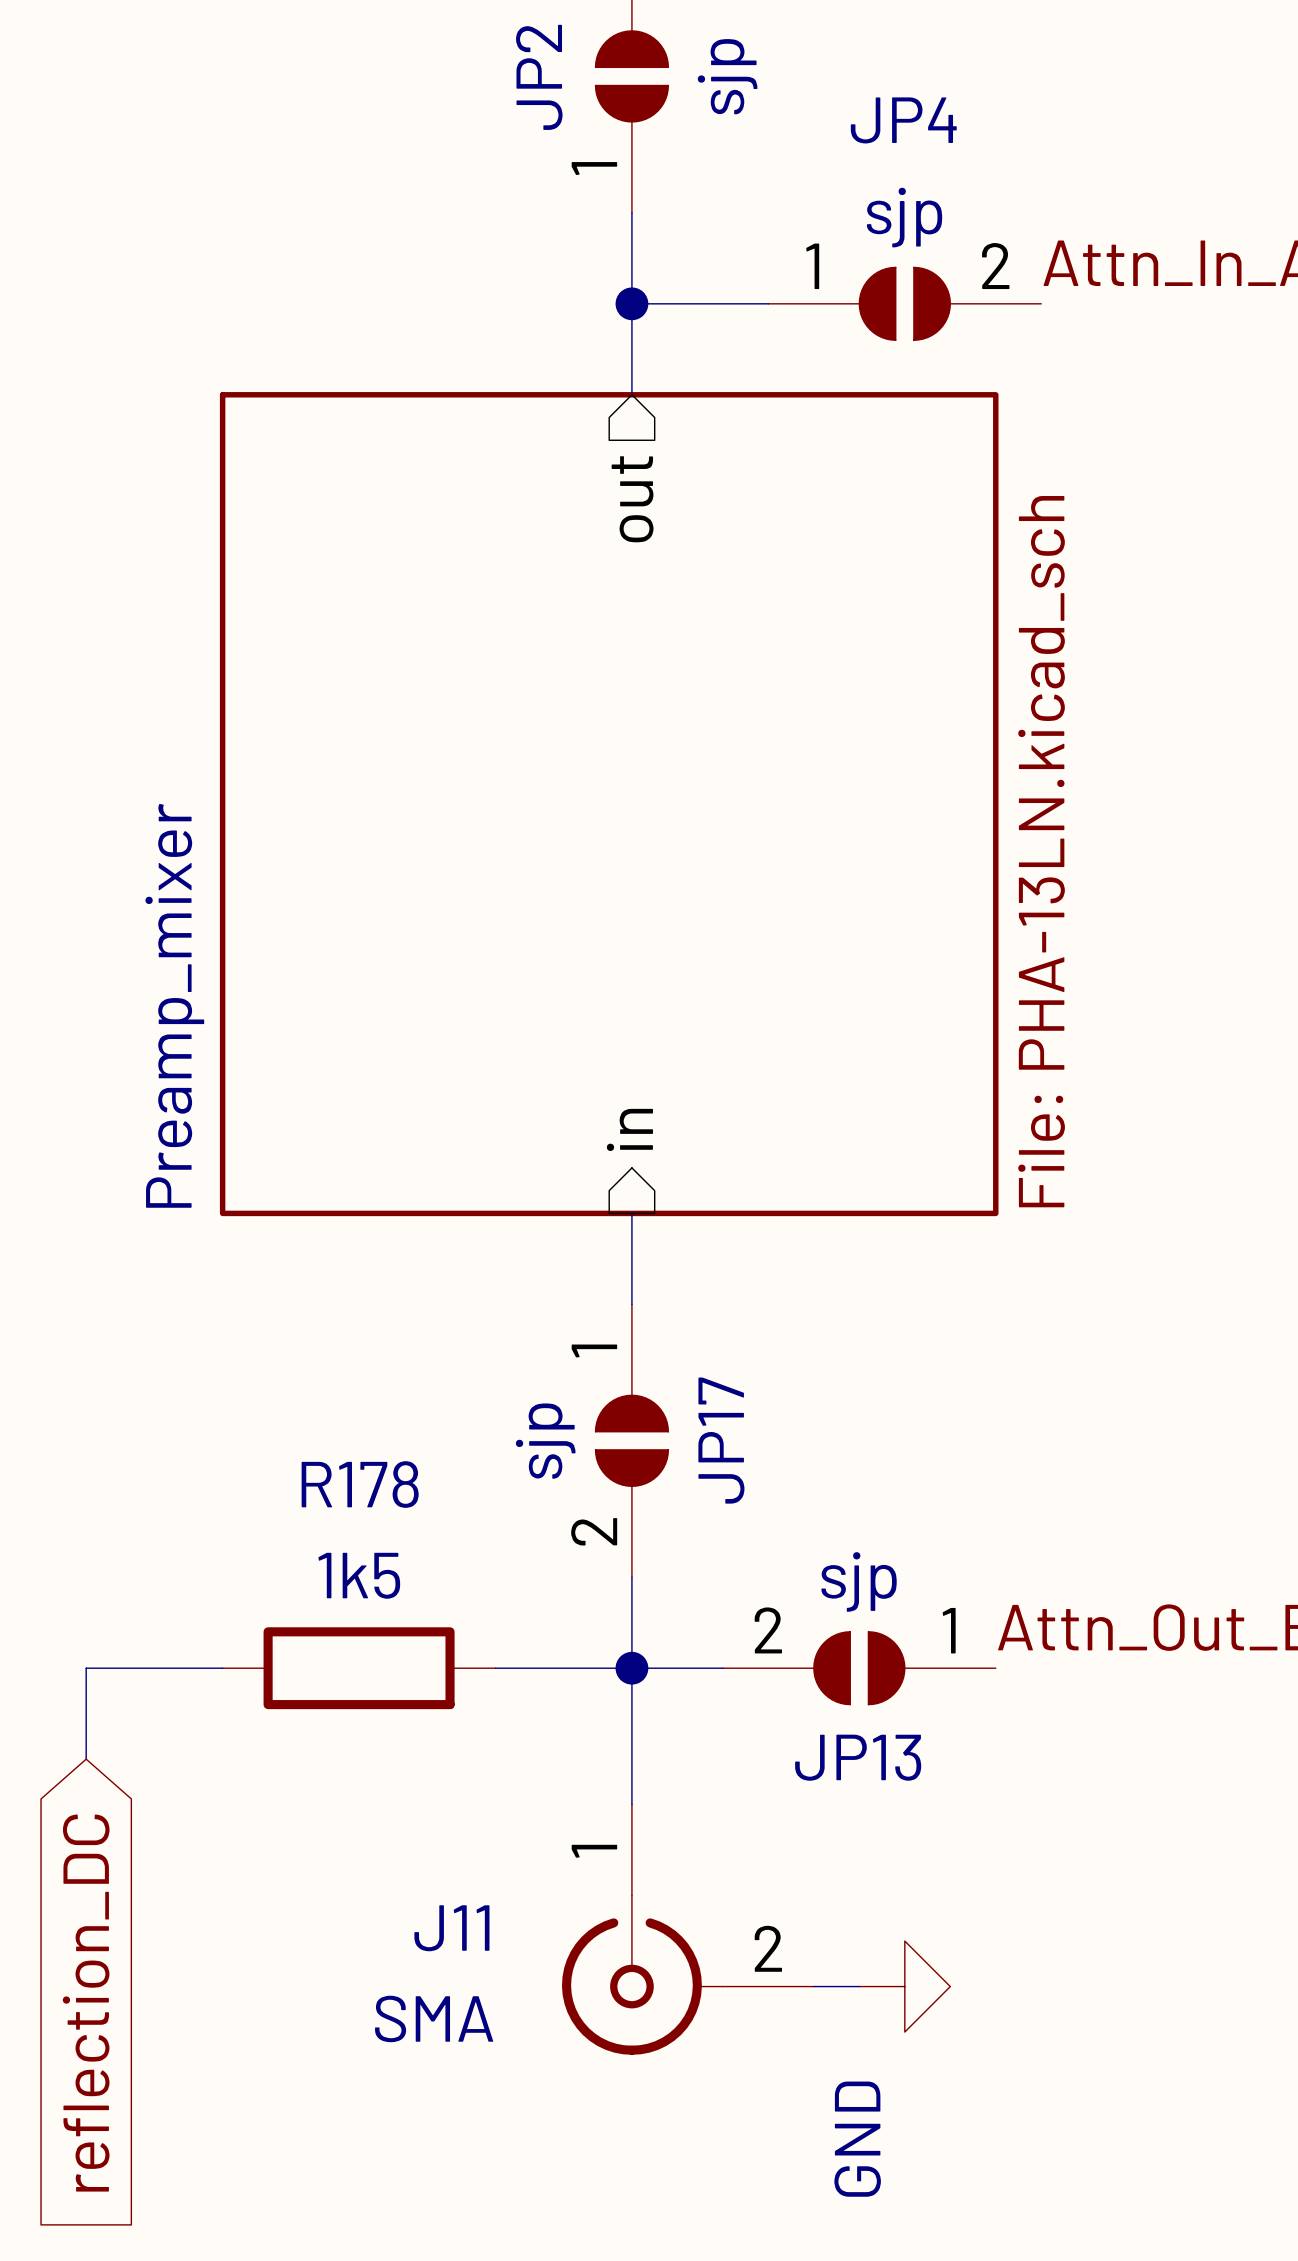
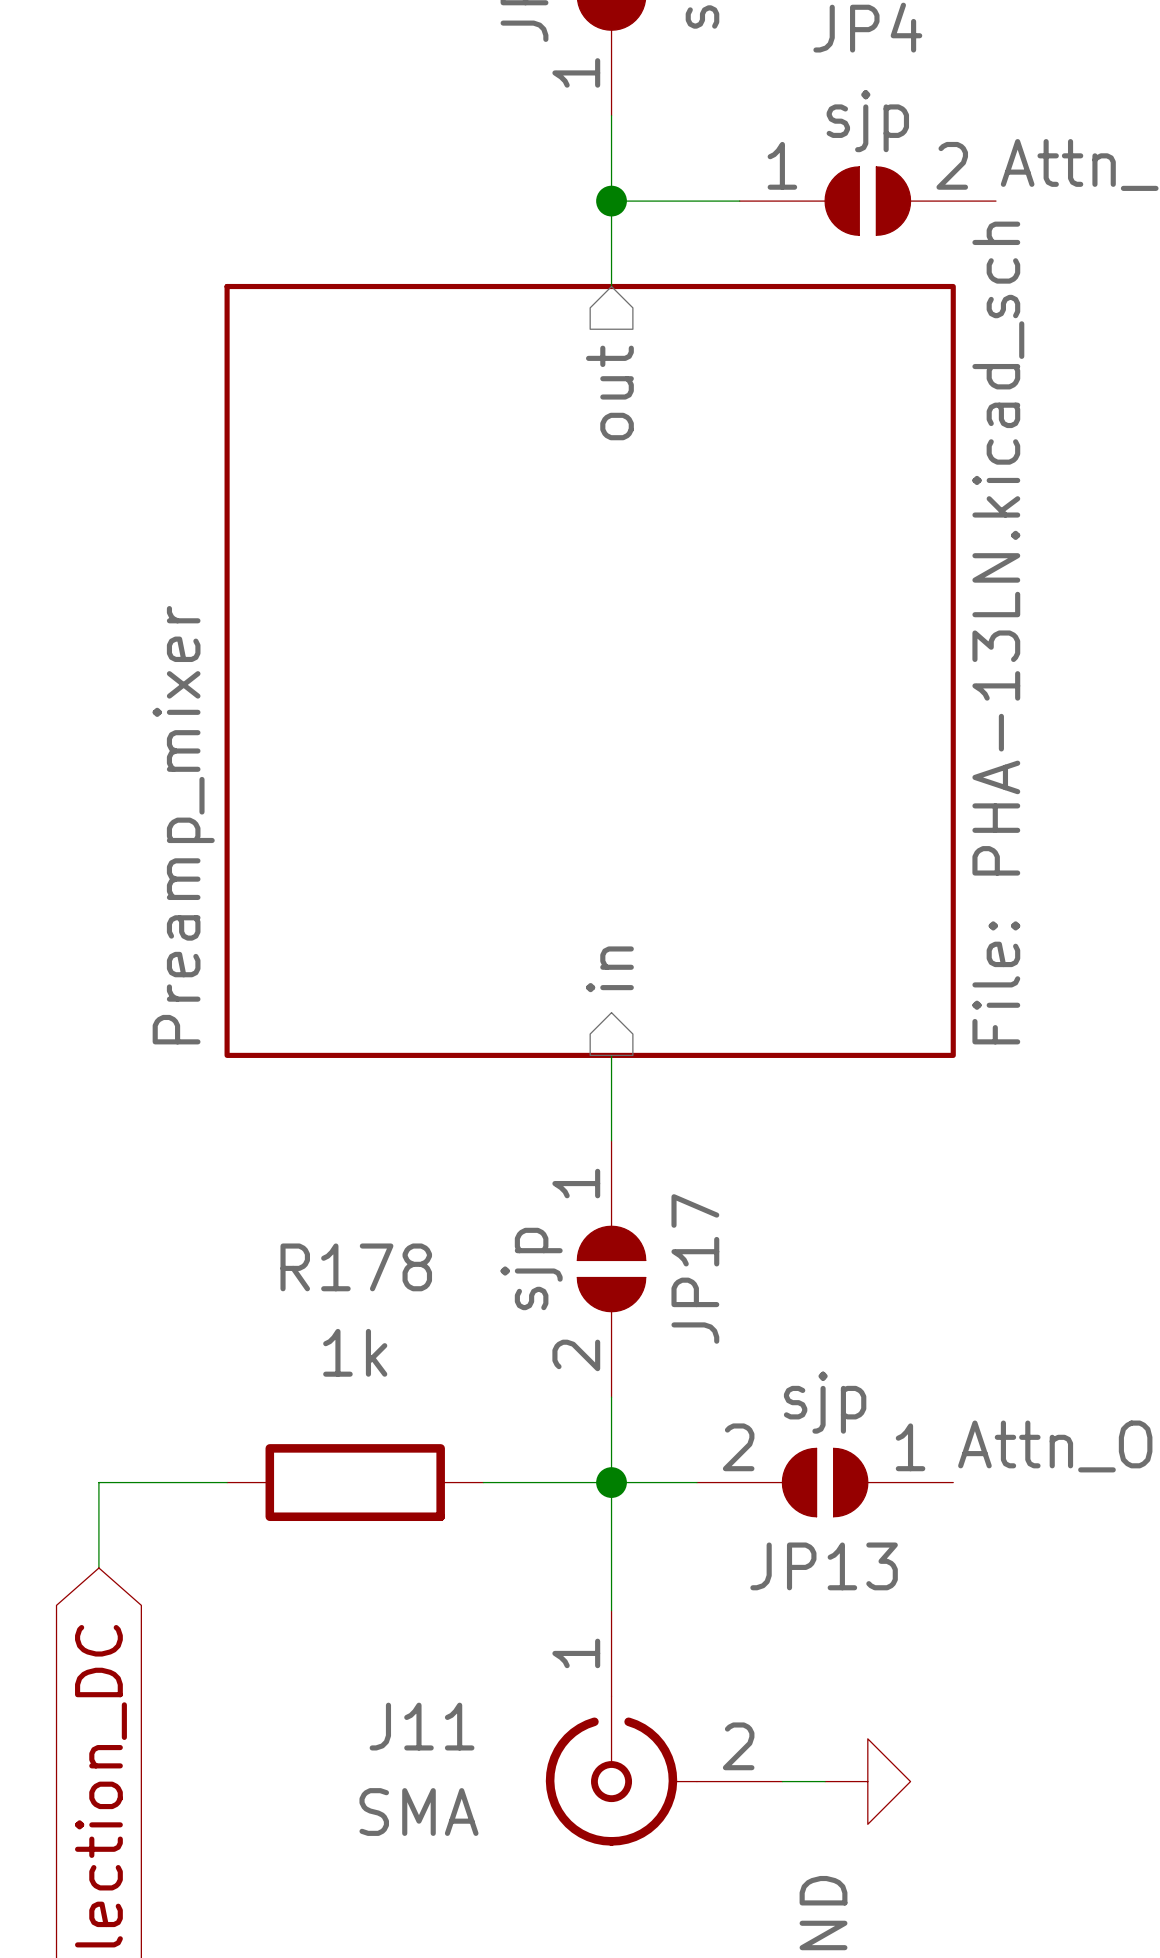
R178 name position: R178 (360, 1484) -> R178 (356, 1267)
R178 value: 1k5 (359, 1575) -> 1k (355, 1352)

